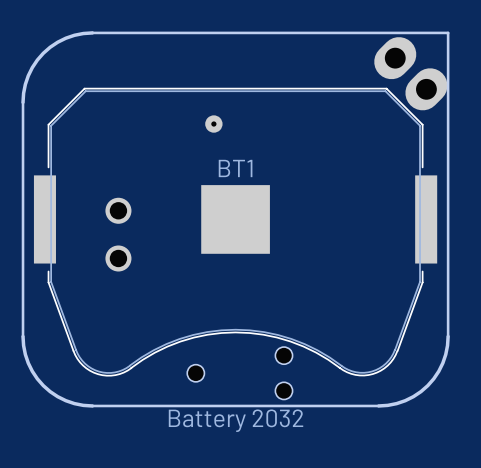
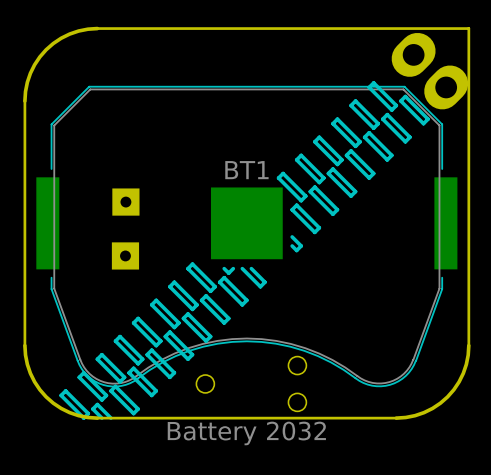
line: none -> (373, 82) (369, 87) (391, 110) (396, 105) (373, 82)
line: none -> (405, 96) (400, 101) (423, 123) (428, 119) (405, 96)
line: none -> (355, 101) (351, 105) (373, 128) (378, 123) (355, 101)
line: none -> (387, 114) (382, 119) (405, 141) (409, 137) (387, 114)
line: none -> (337, 119) (332, 123) (355, 146) (360, 141) (337, 119)
part: (213, 124) -> none
line: none -> (369, 132) (364, 137) (387, 159) (391, 155) (369, 132)
line: none -> (319, 137) (314, 141) (337, 164) (341, 159) (319, 137)
line: none -> (351, 150) (346, 155) (369, 178) (373, 173) (351, 150)
line: none -> (301, 155) (296, 159) (319, 182) (323, 178) (301, 155)
line: none -> (332, 168) (328, 173) (351, 196) (355, 191) (332, 168)
line: none -> (283, 173) (278, 178) (301, 200) (305, 196) (283, 173)
line: none -> (314, 187) (310, 191) (332, 214) (337, 209) (314, 187)
part footprint: [105, 197, 132, 272] -> [111, 188, 140, 270]
line: none -> (296, 205) (292, 209) (314, 232) (319, 227) (296, 205)
line: none -> (292, 236) (301, 245) (296, 250) (292, 245)
line: none -> (192, 264) (187, 268) (210, 291) (215, 286) (192, 264)
line: none -> (233, 268) (228, 273) (224, 268)
line: none -> (251, 268) (264, 282) (260, 286) (242, 268)
line: none -> (224, 277) (219, 282) (242, 304) (246, 300) (224, 277)
line: none -> (174, 282) (169, 286) (192, 309) (197, 304) (174, 282)
line: none -> (206, 295) (201, 300) (224, 323) (228, 318) (206, 295)
line: none -> (156, 300) (151, 304) (174, 327) (178, 323) (156, 300)
line: none -> (187, 313) (183, 318) (206, 341) (210, 336) (187, 313)
line: none -> (138, 318) (133, 323) (156, 345) (160, 341) (138, 318)
line: none -> (169, 332) (165, 336) (187, 359) (192, 354) (169, 332)
line: none -> (120, 336) (115, 341) (138, 363) (142, 359) (120, 336)
line: none -> (151, 350) (174, 372) (169, 377) (147, 354) (151, 350)
line: none -> (101, 354) (97, 359) (120, 381) (124, 377) (101, 354)
line: none -> (133, 368) (129, 372) (151, 395) (156, 390) (133, 368)
line: none -> (83, 372) (79, 377) (101, 400) (106, 395) (83, 372)
line: none -> (115, 386) (110, 390) (133, 413) (138, 409) (115, 386)
line: none -> (65, 390) (61, 395) (83, 418) (88, 413) (65, 390)
line: none -> (110, 418) (97, 404) (92, 409) (101, 418)

